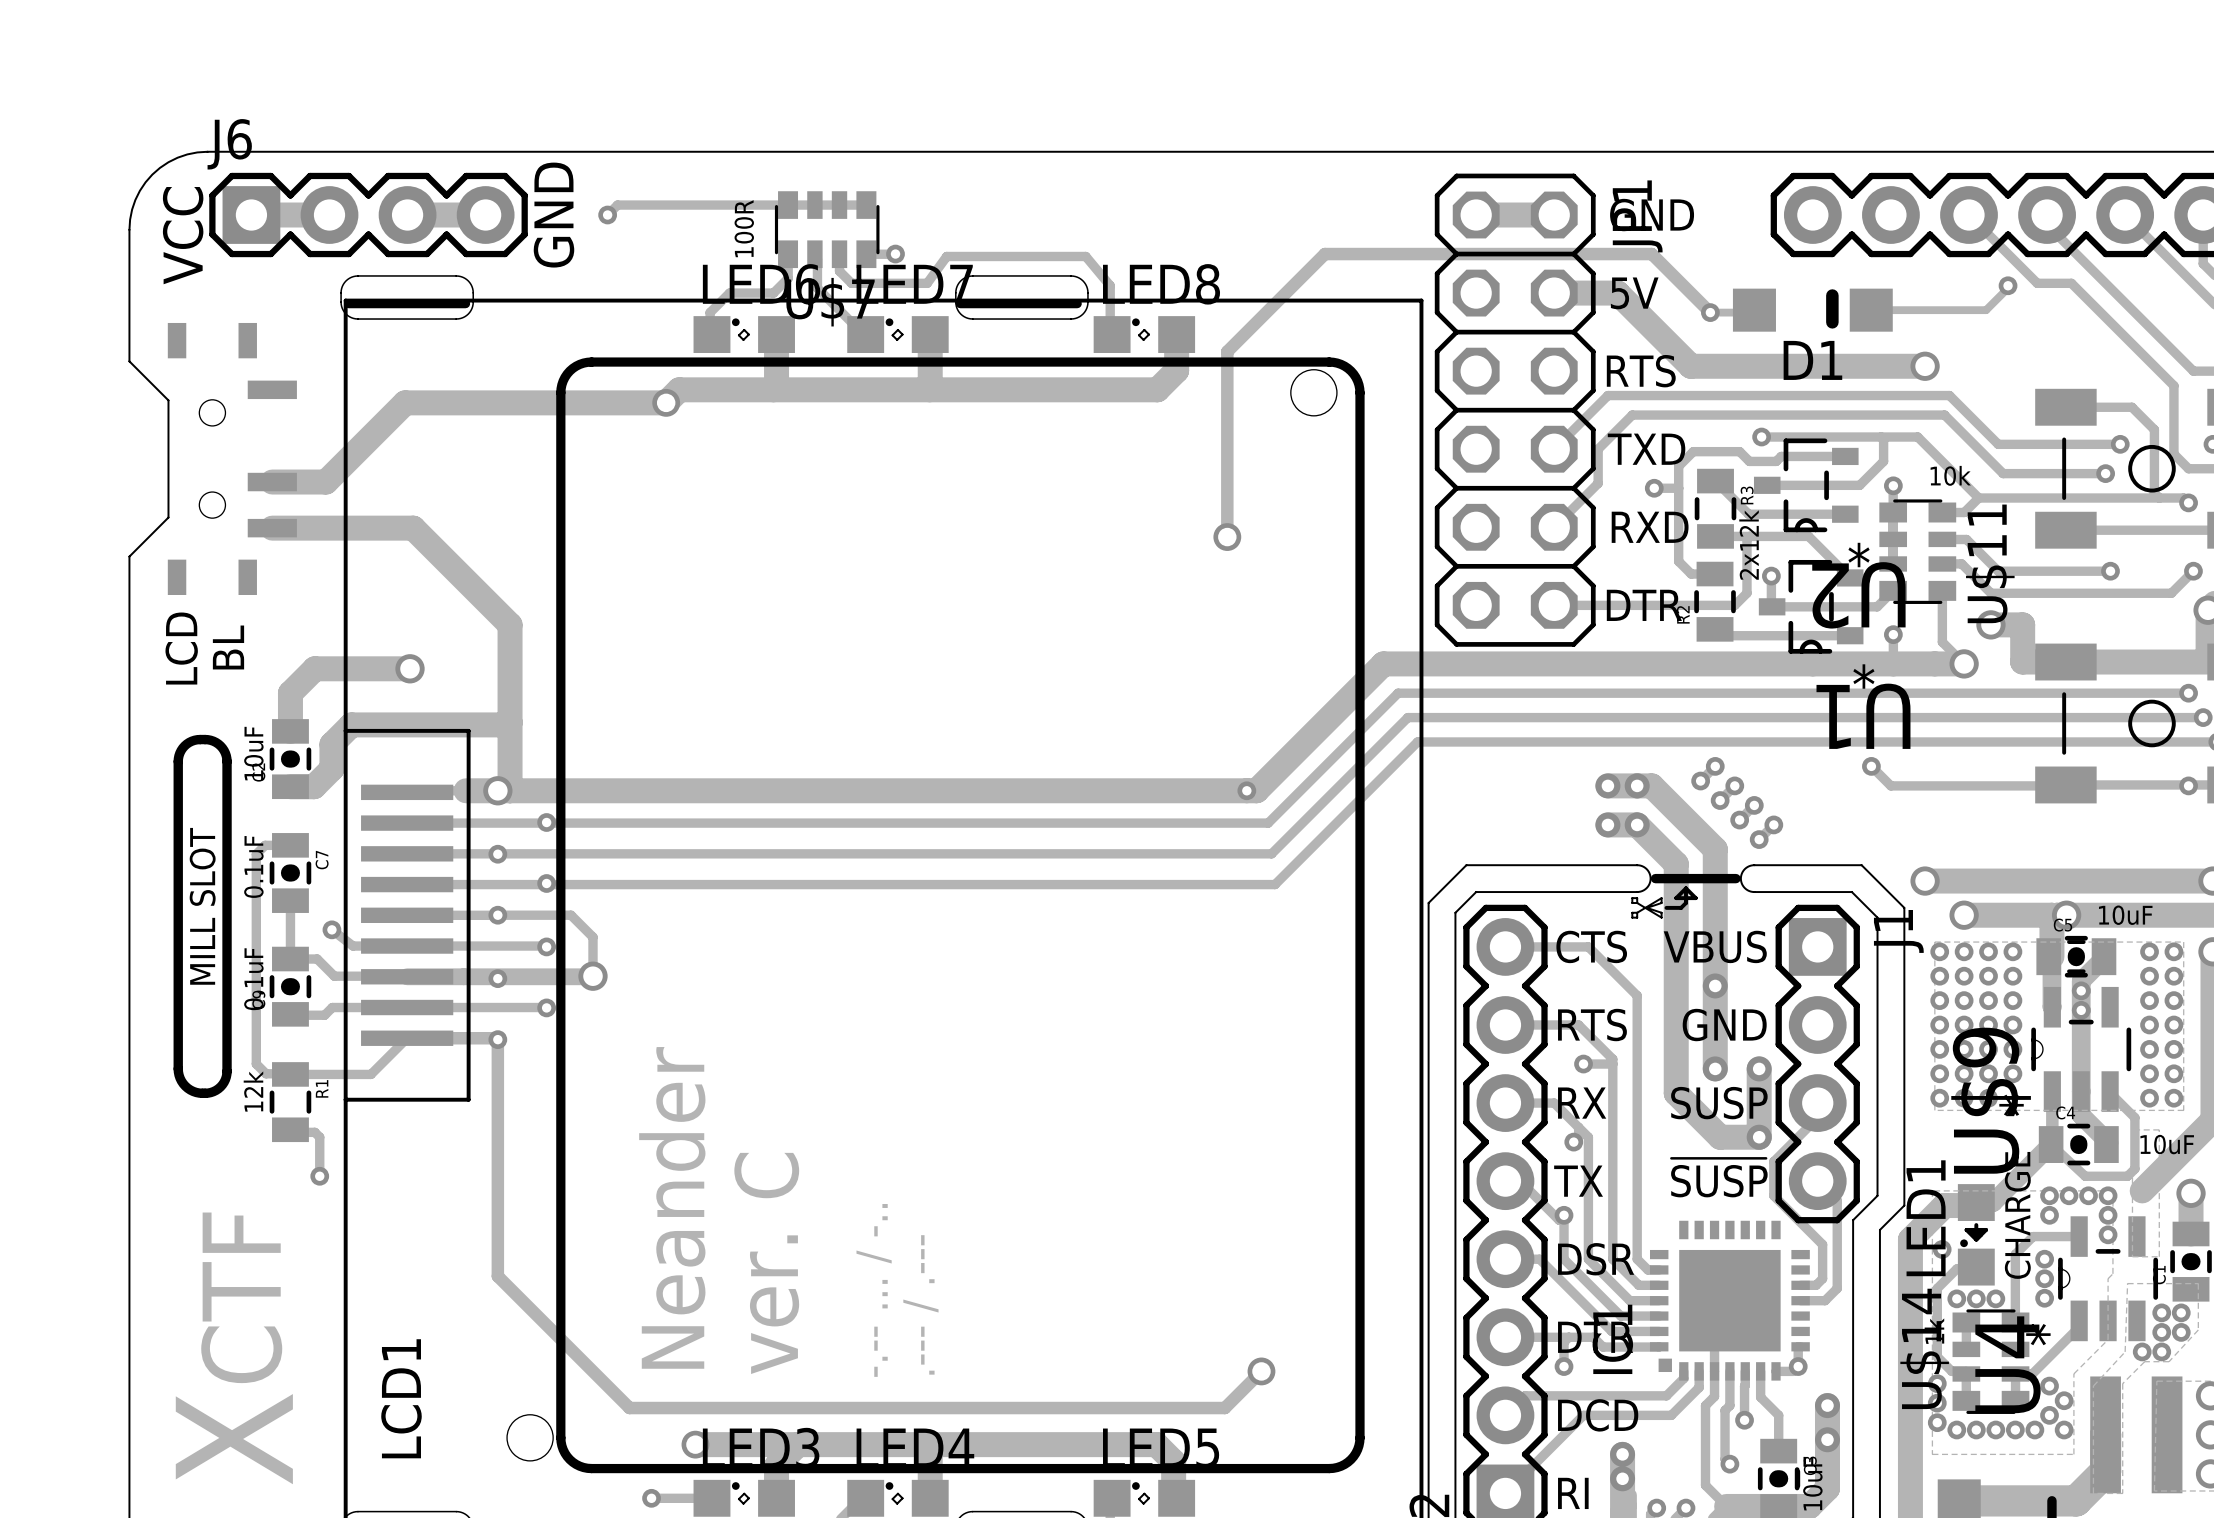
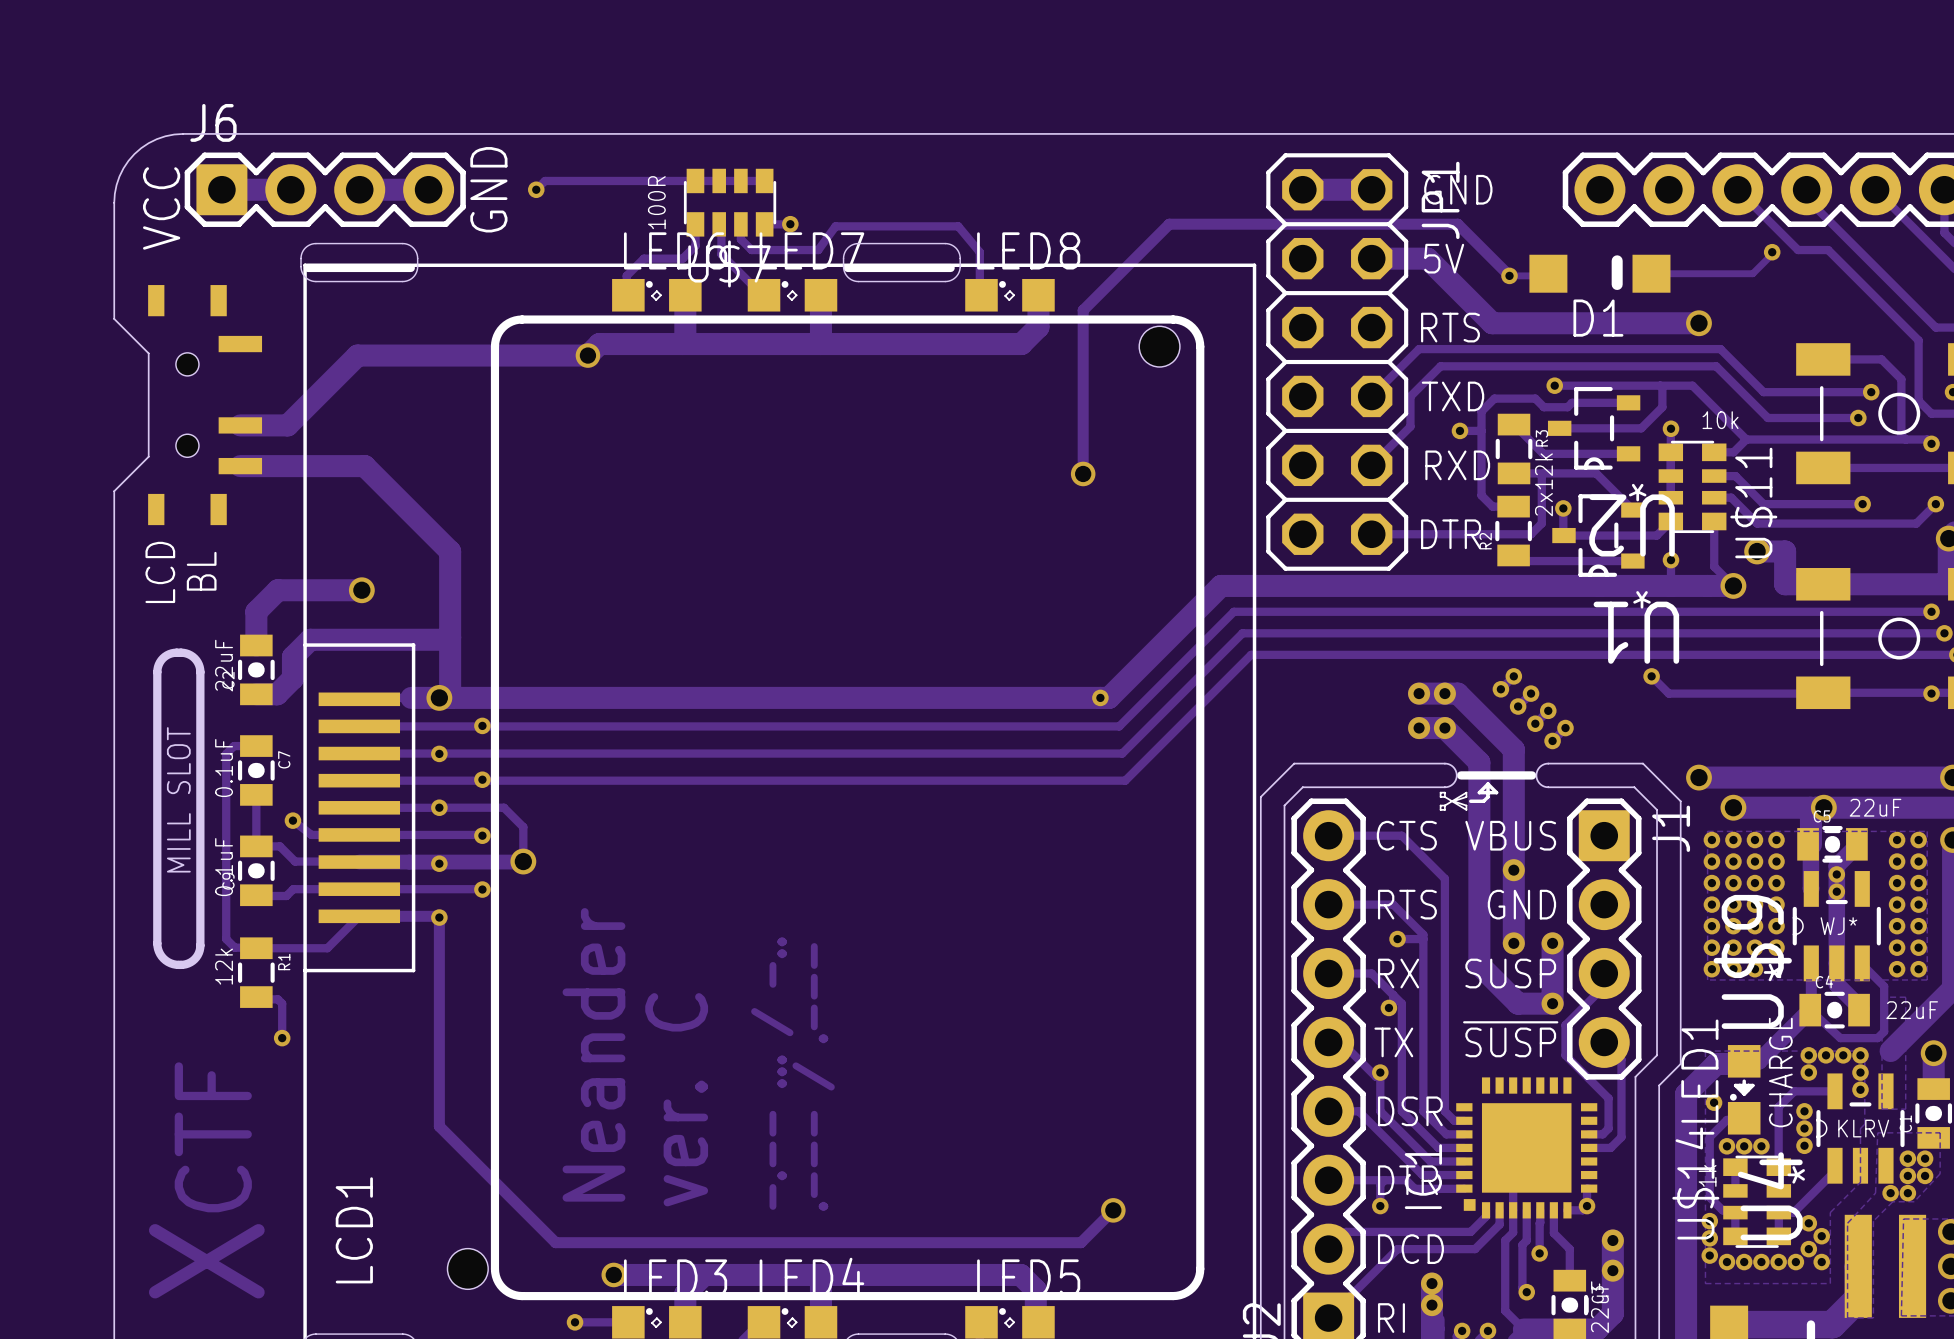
text: 10uF (253, 753) -> 22uF (224, 665)
text: 10uF (2125, 915) -> 22uF (1875, 807)
text: none -> WJ* (1838, 926)
text: 10uF (2167, 1144) -> 22uF (1912, 1010)
text: none -> KLRV (1863, 1128)
text: 10uF (1812, 1483) -> 22uF (1599, 1307)

